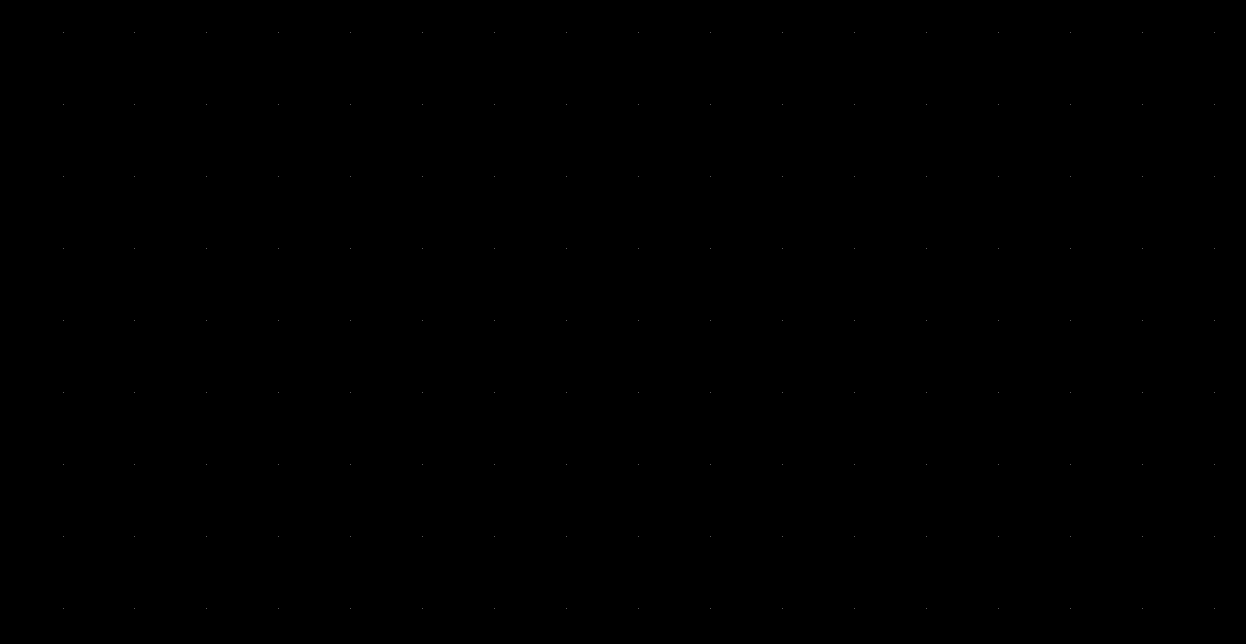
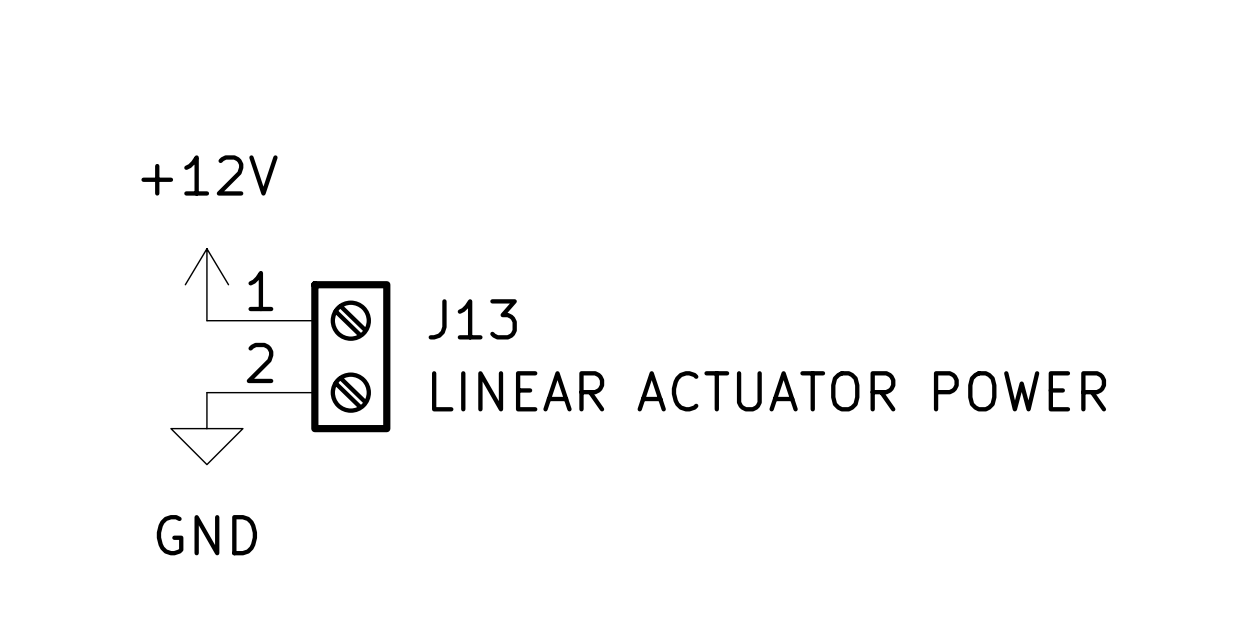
power symbol: none -> +12V (206, 284)
J13: none -> LINEAR ACTUATOR POWER (298, 356)
power symbol: none -> GND (206, 428)

